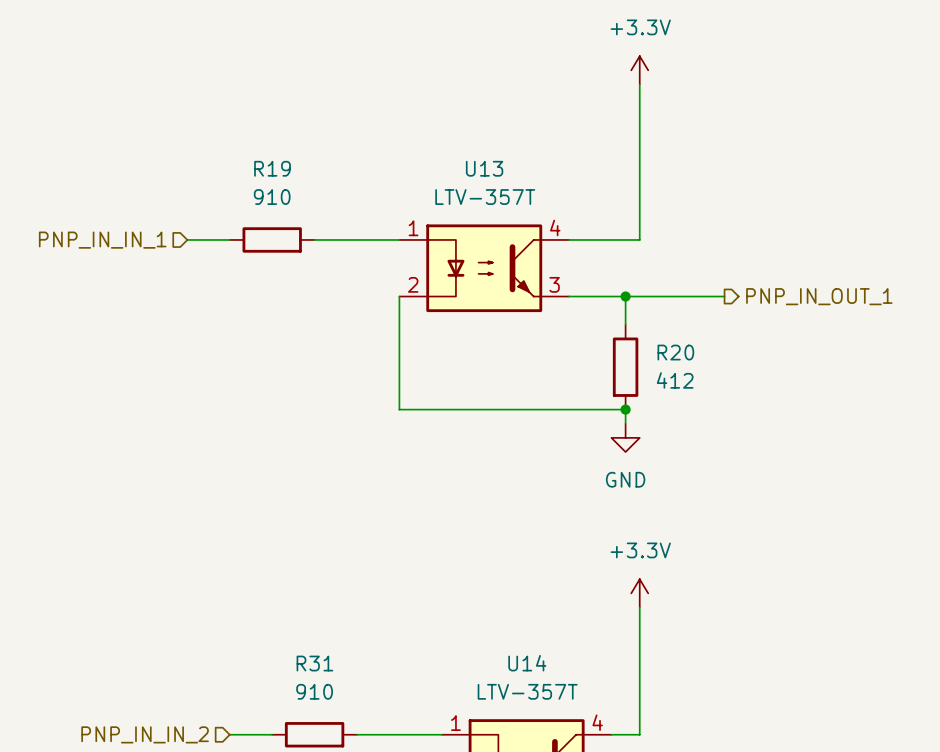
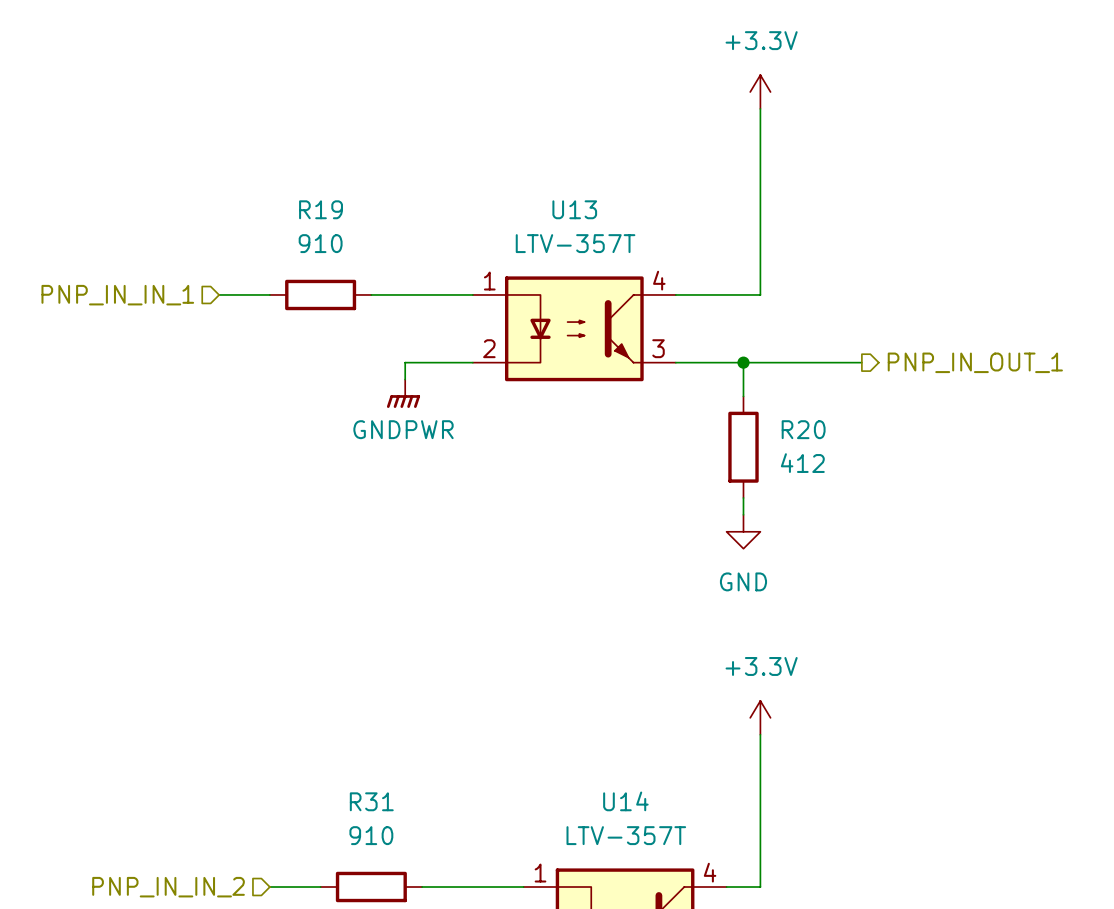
wire: (399, 296) (399, 409) (625, 409) -> (472, 362) (405, 362) (405, 379)
power symbol: none -> GNDPWR (403, 393)
junction: (625, 409) -> none

